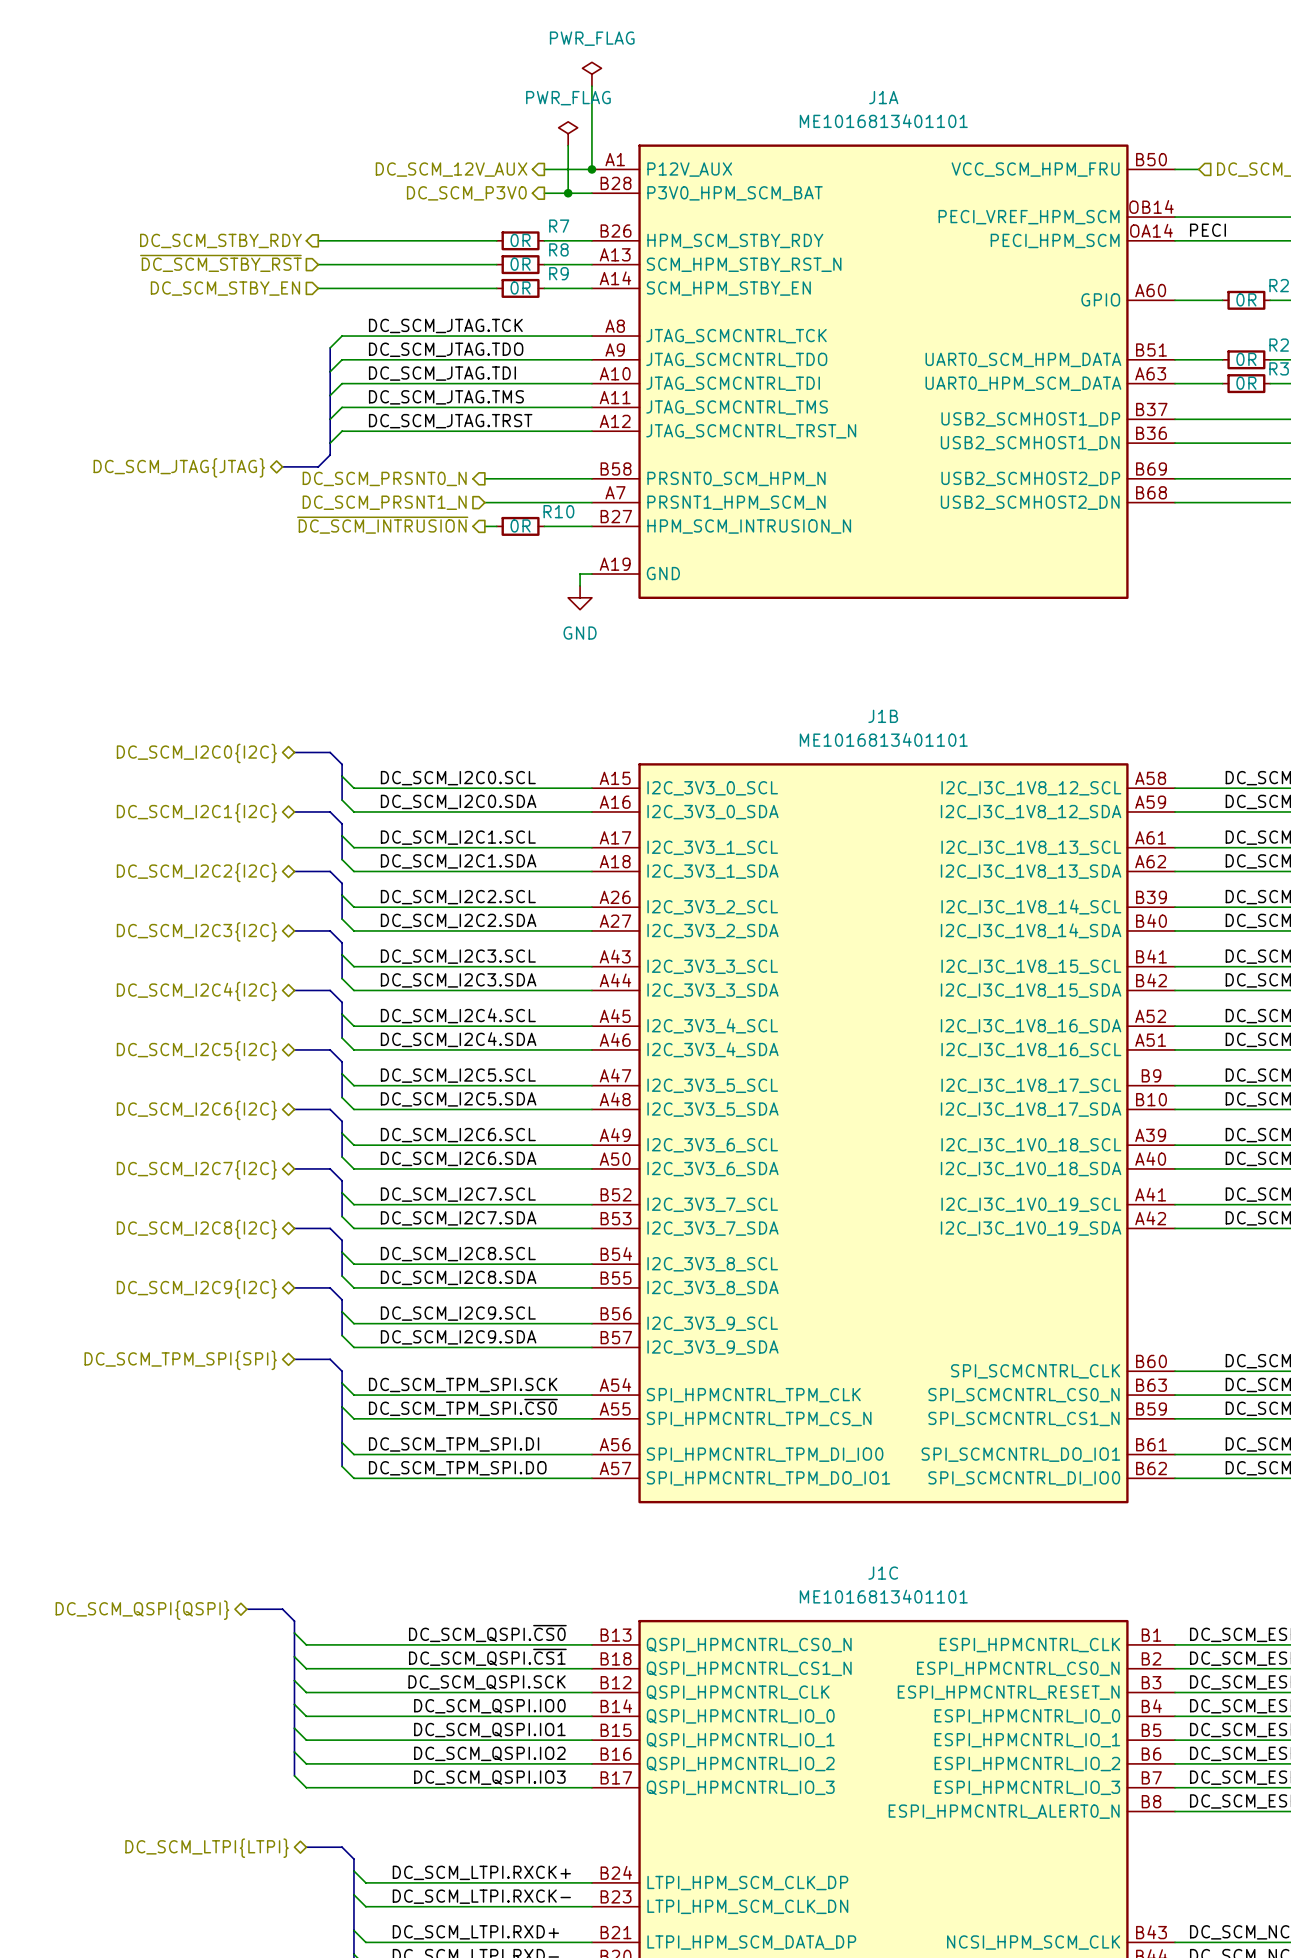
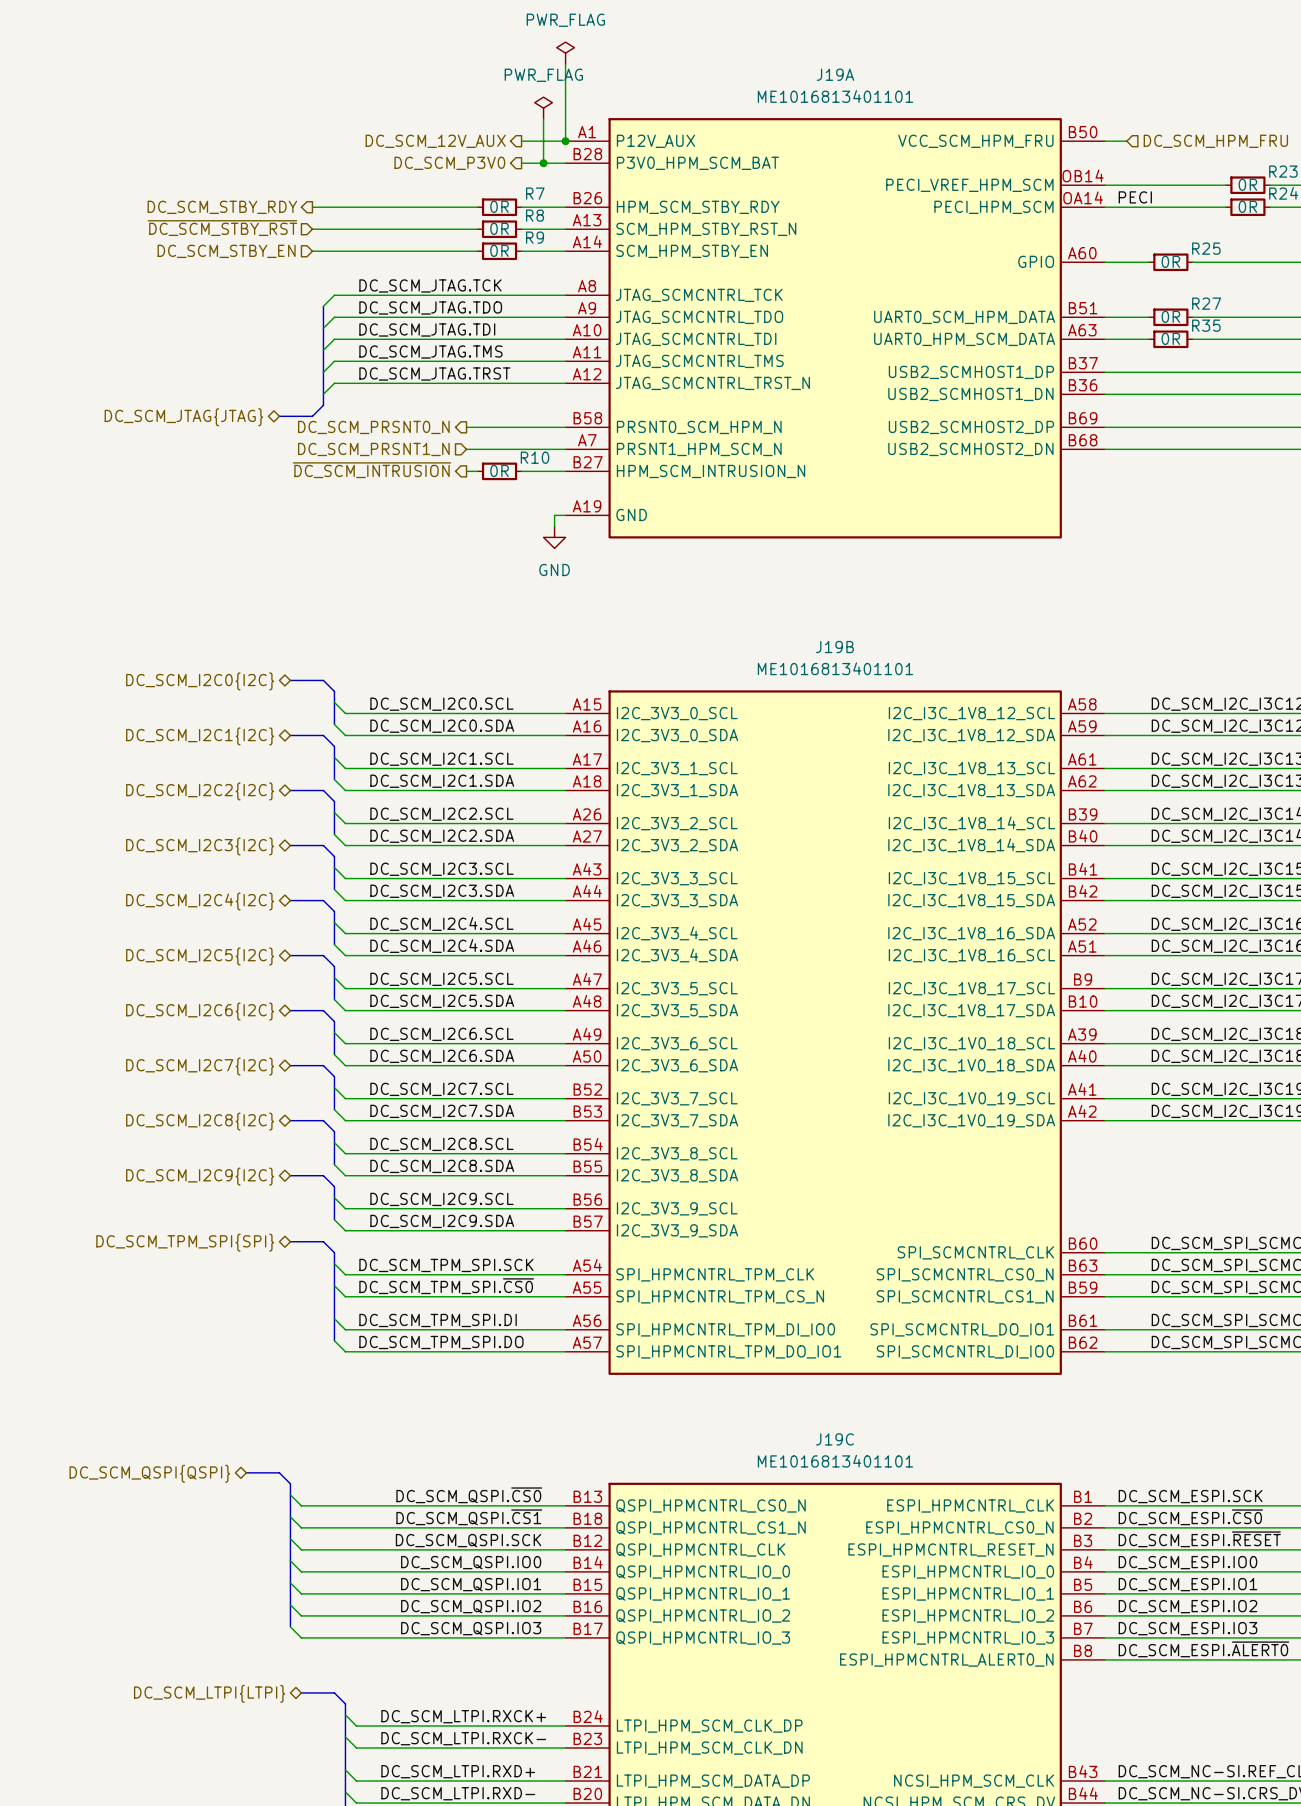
J1A name: J1A (883, 97) -> J19A (835, 74)
J1B name: J1B (883, 716) -> J19B (834, 647)
J1C name: J1C (883, 1573) -> J19C (834, 1439)

